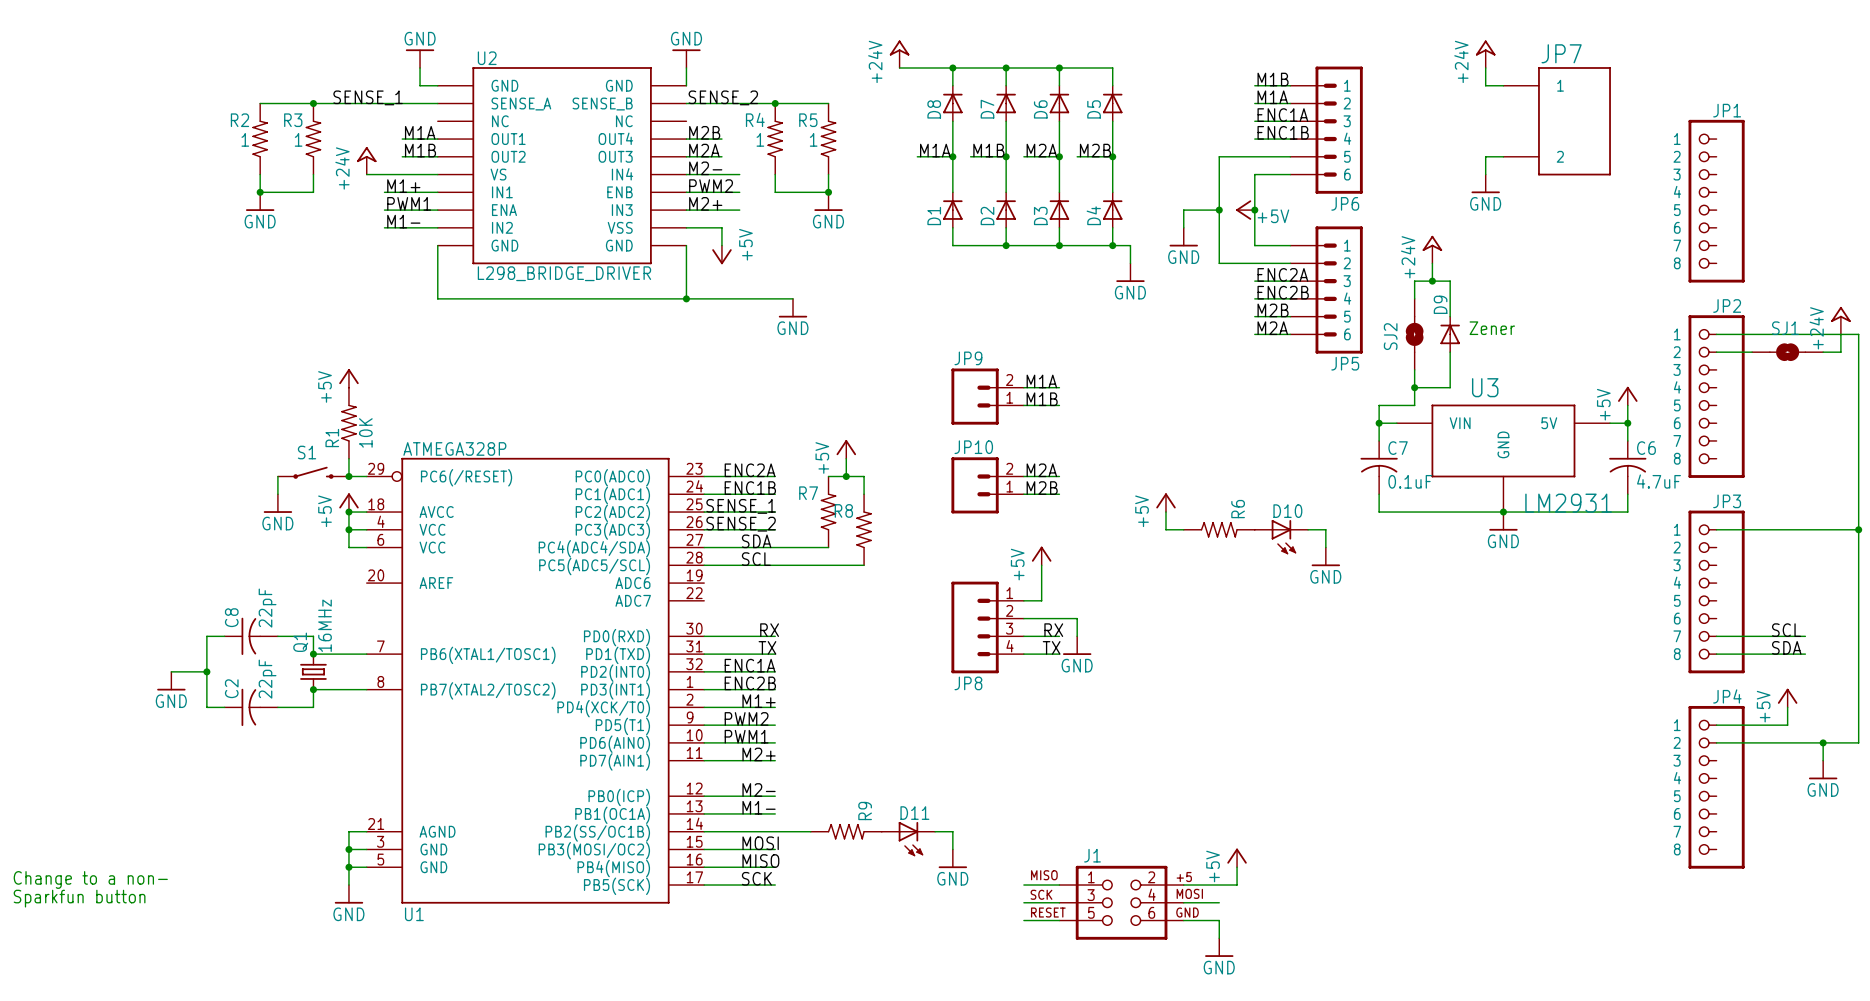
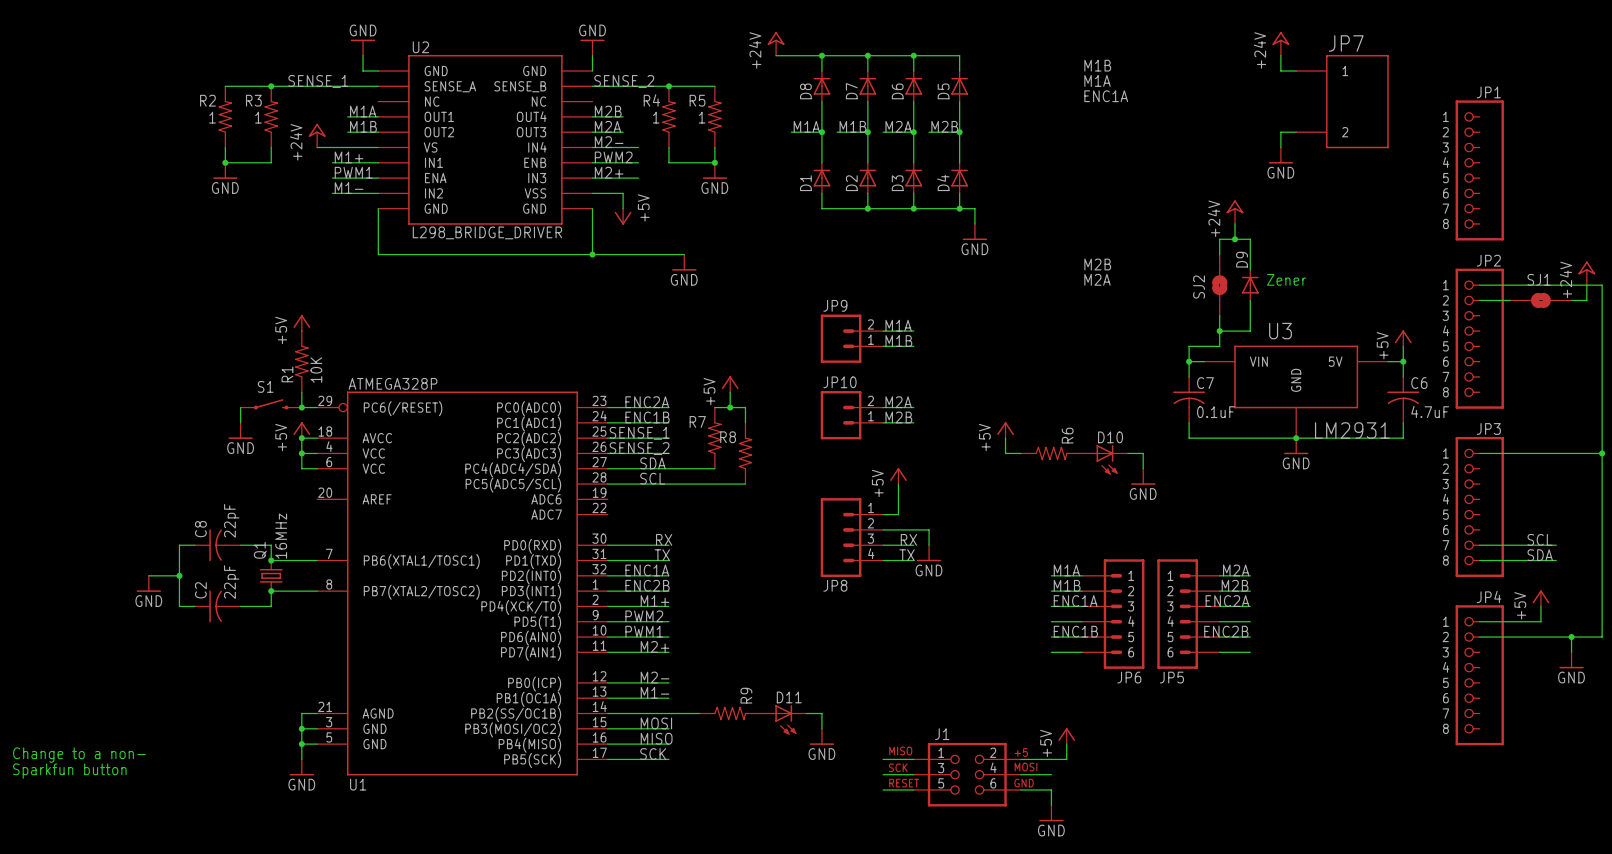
wire: (1254, 85) (1290, 85) -> none
wire: (1254, 103) (1290, 103) -> none
wire: (1254, 121) (1290, 121) -> none
JP6 position: (1326, 130) -> (1113, 614)
label: ENC1B (1283, 132) -> none
wire: (1254, 139) (1290, 139) -> none
wire: (1290, 156) (1219, 156) (1219, 263) (1290, 263) -> none
wire: (1290, 174) (1254, 174) (1254, 245) (1290, 245) -> none
wire: (1219, 210) (1183, 210) (1183, 227) -> none
junction: (1219, 210) -> none
power symbol: +5V (1245, 210) -> none
junction: (1254, 210) -> none
power symbol: GND (1183, 237) -> none
label: ENC2A (1282, 274) -> none
wire: (1254, 281) (1290, 281) -> none
JP5 position: (1326, 290) -> (1188, 614)
JP5 flip: as is (1339, 290) -> left-right (1177, 614)
label: ENC2B (1283, 292) -> none
wire: (1254, 298) (1290, 298) -> none
wire: (1254, 316) (1290, 316) -> none
wire: (1254, 334) (1290, 334) -> none
label: none -> M1A (1066, 570)
label: none -> M2A (1236, 570)
wire: none -> (1051, 575) (1082, 575)
wire: none -> (1219, 575) (1250, 575)
label: none -> M1B (1067, 585)
label: none -> M2B (1235, 585)
wire: none -> (1051, 591) (1082, 591)
wire: none -> (1219, 591) (1250, 591)
label: none -> ENC1A (1075, 601)
label: none -> ENC2A (1227, 601)
wire: none -> (1051, 606) (1082, 606)
wire: none -> (1219, 606) (1250, 606)
wire: none -> (1051, 621) (1082, 621)
wire: none -> (1219, 621) (1250, 621)
label: none -> ENC1B (1075, 631)
label: none -> ENC2B (1226, 631)
wire: none -> (1051, 637) (1082, 637)
wire: none -> (1219, 637) (1250, 637)
wire: none -> (1051, 652) (1082, 652)
wire: none -> (1219, 652) (1250, 652)

